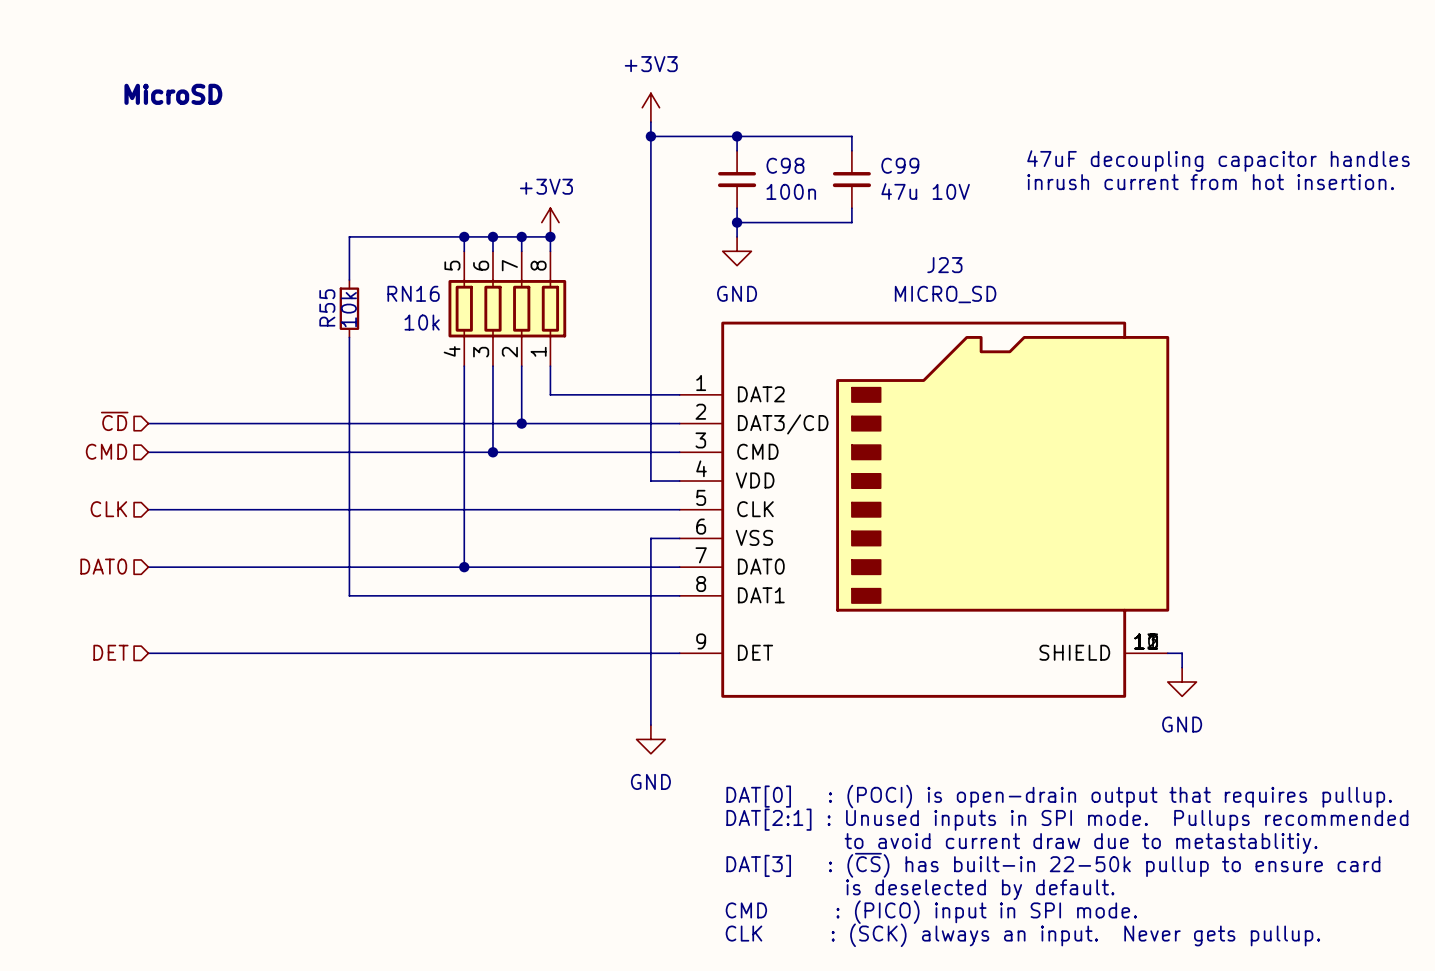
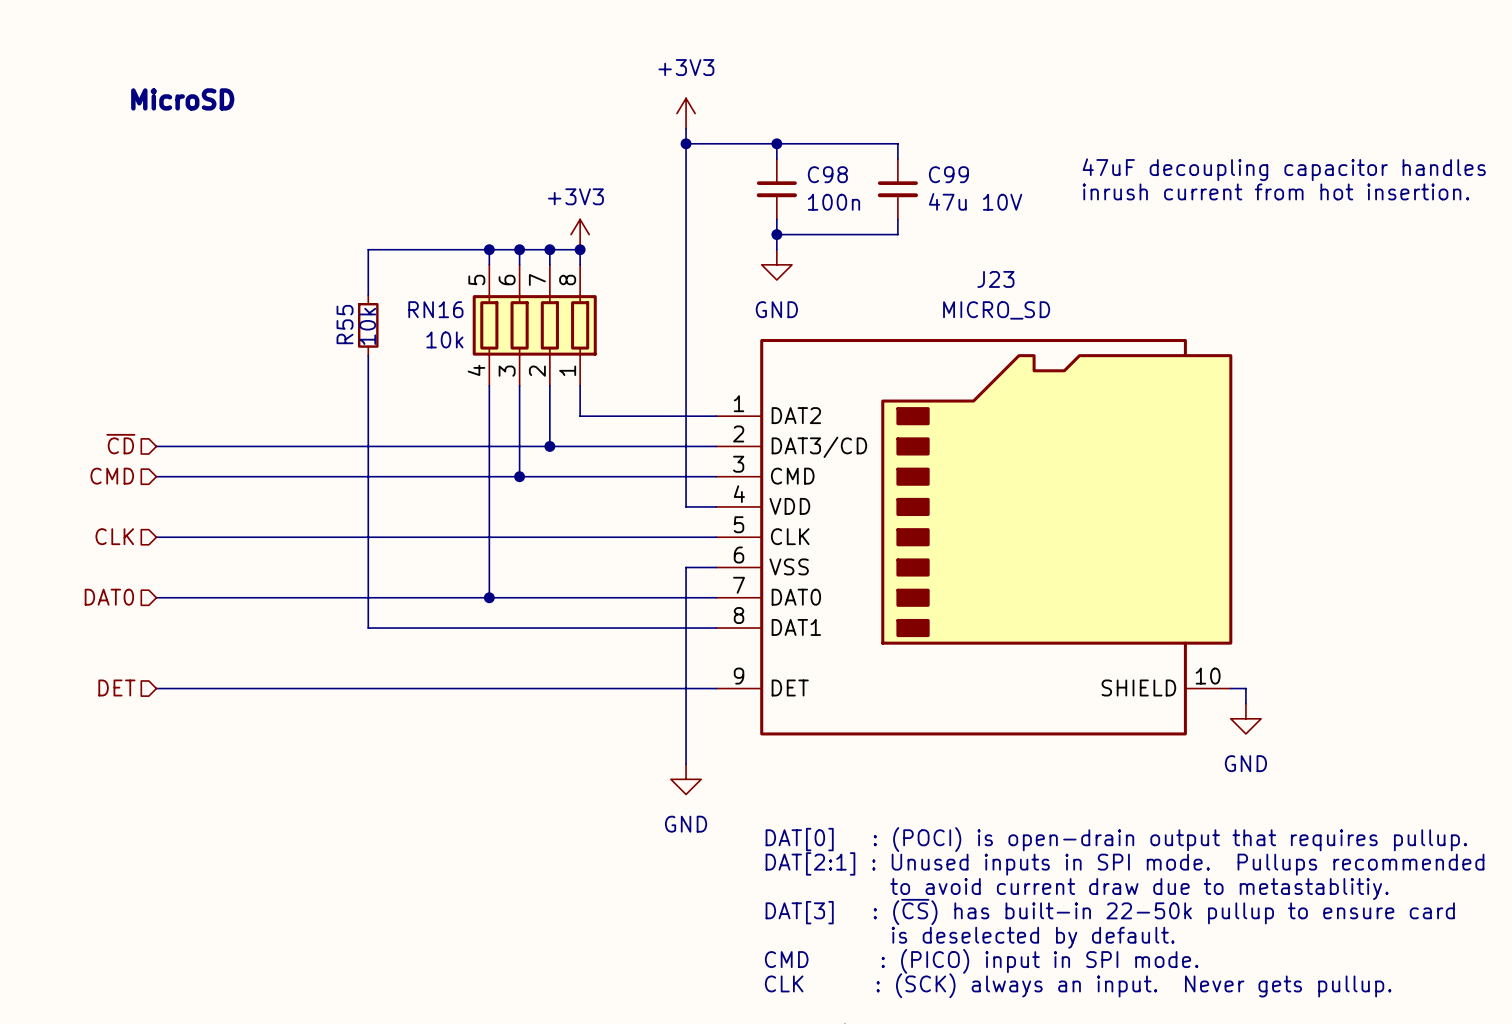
J23 symbol: [679, 321, 1170, 698] -> [716, 339, 1233, 736]

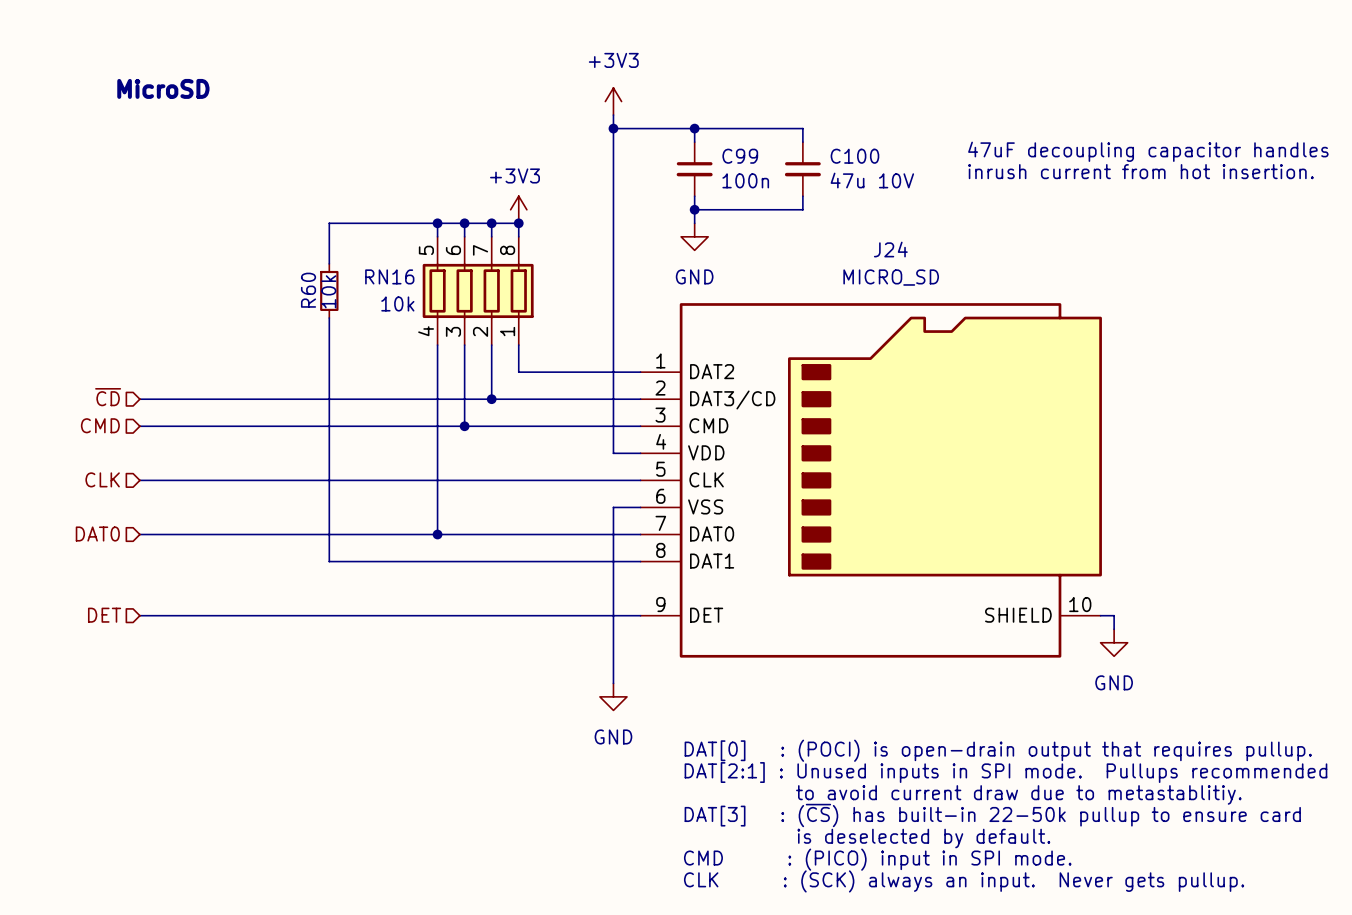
C98 name: C98 (827, 174) -> C99 (740, 156)
C99 name: C99 (948, 174) -> C100 (854, 156)
J23 name: J23 (995, 279) -> J24 (890, 249)
R55 name: R55 (345, 324) -> R60 (308, 290)

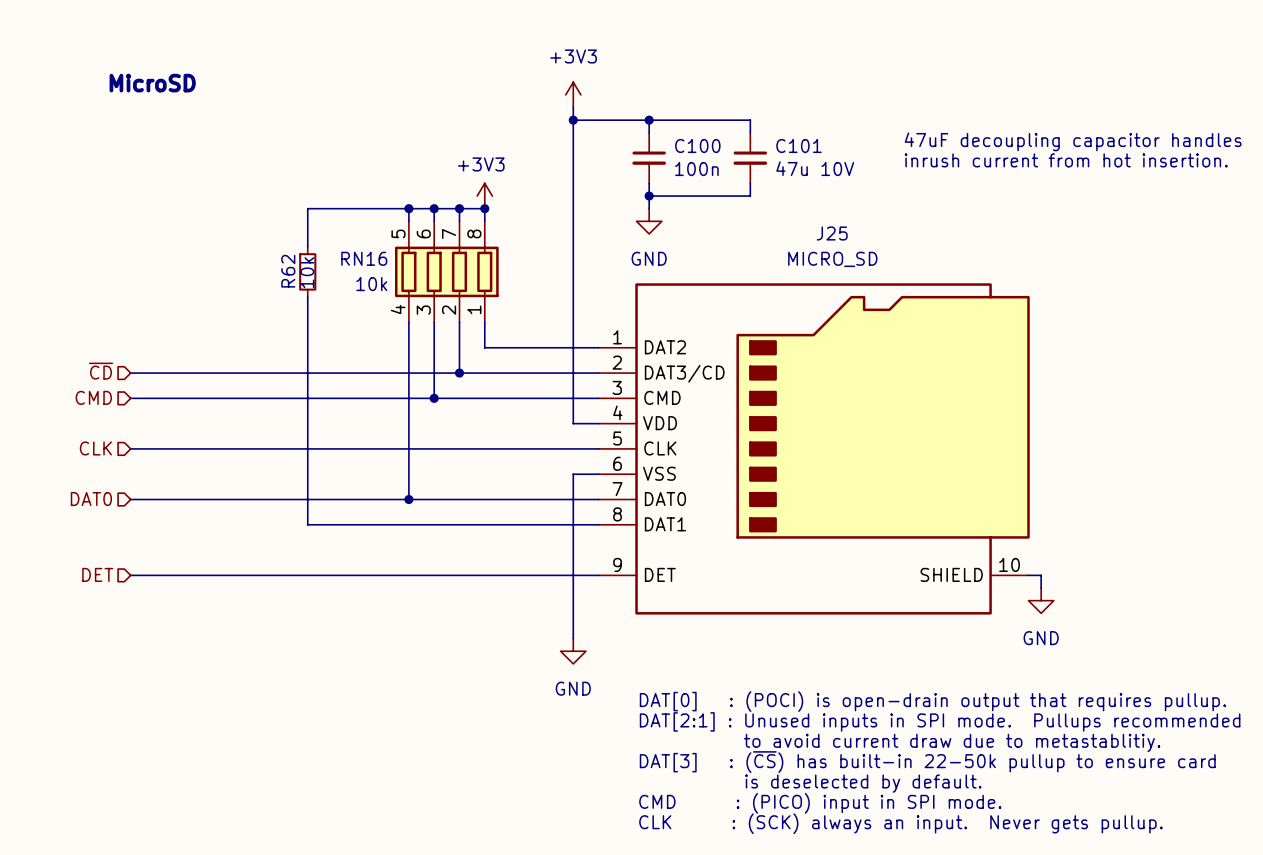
C99 name: C99 (740, 156) -> C100 (697, 145)
C100 name: C100 (854, 156) -> C101 (798, 145)
J24 name: J24 (890, 249) -> J25 (832, 233)
R60 name: R60 (308, 290) -> R62 (288, 271)

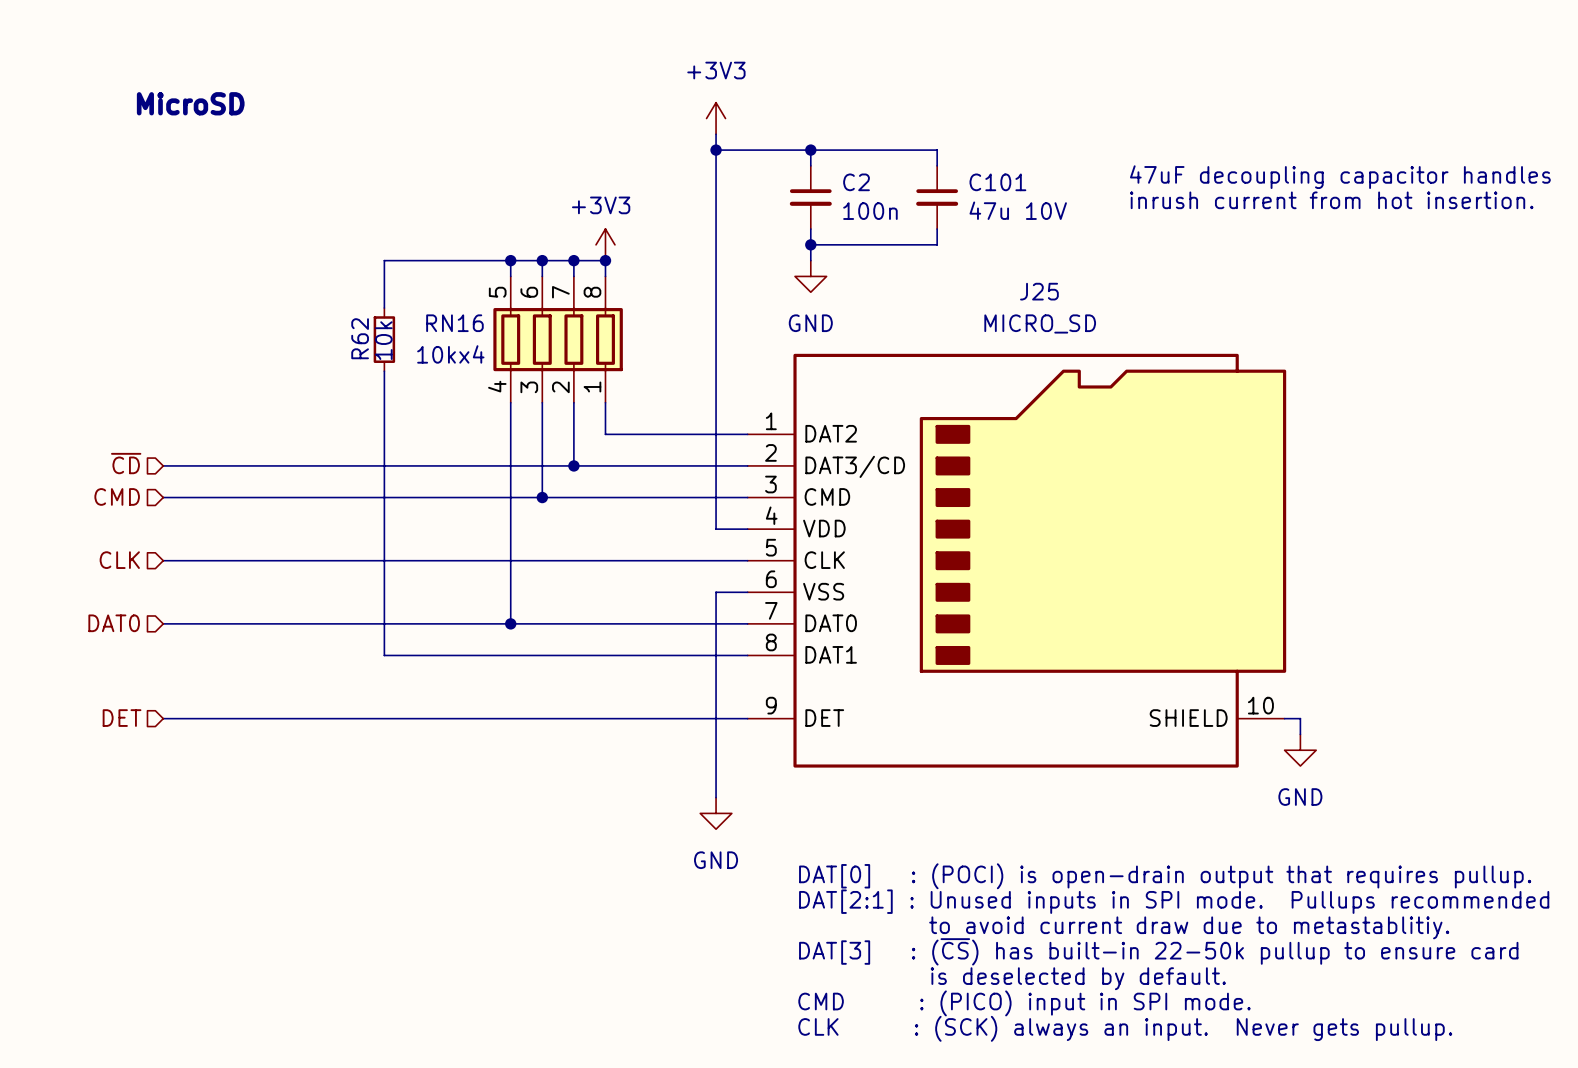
C100 name: C100 (697, 145) -> C2 (856, 182)
RN16 value: 10k (371, 284) -> 10kx4 (450, 354)

